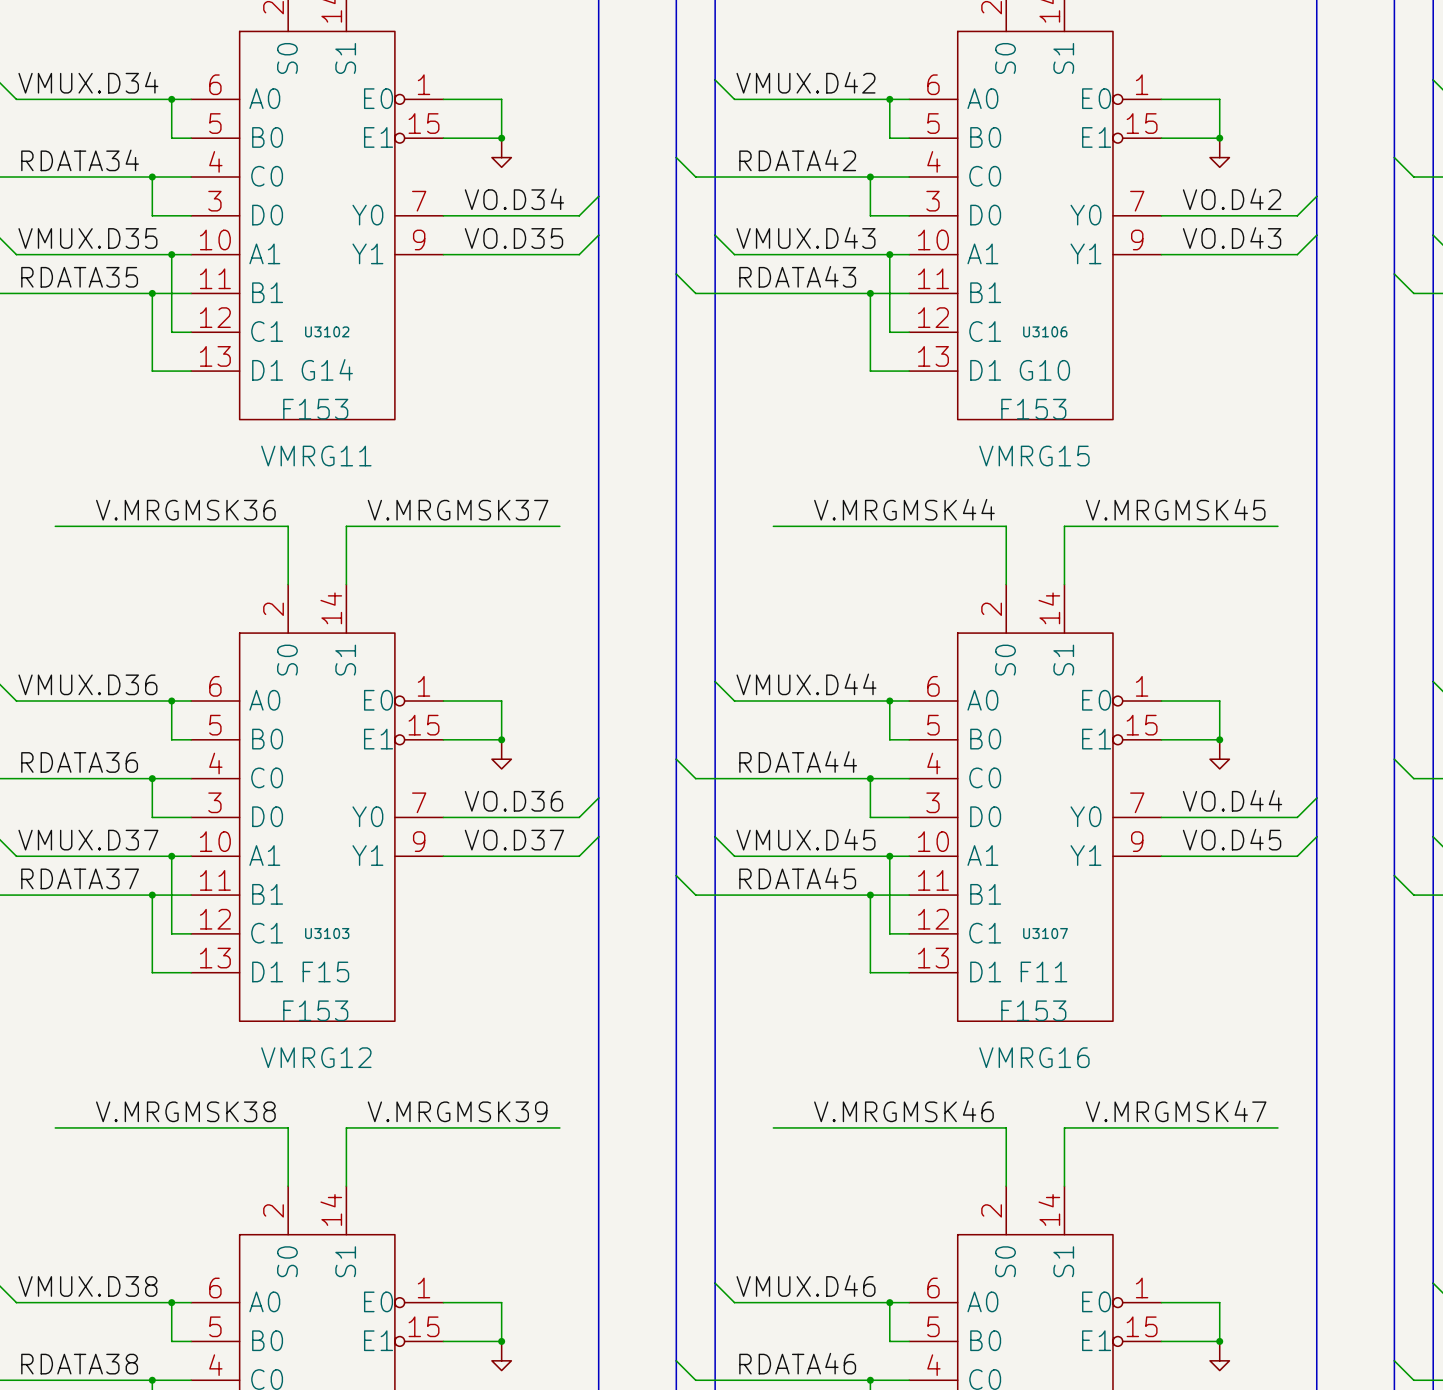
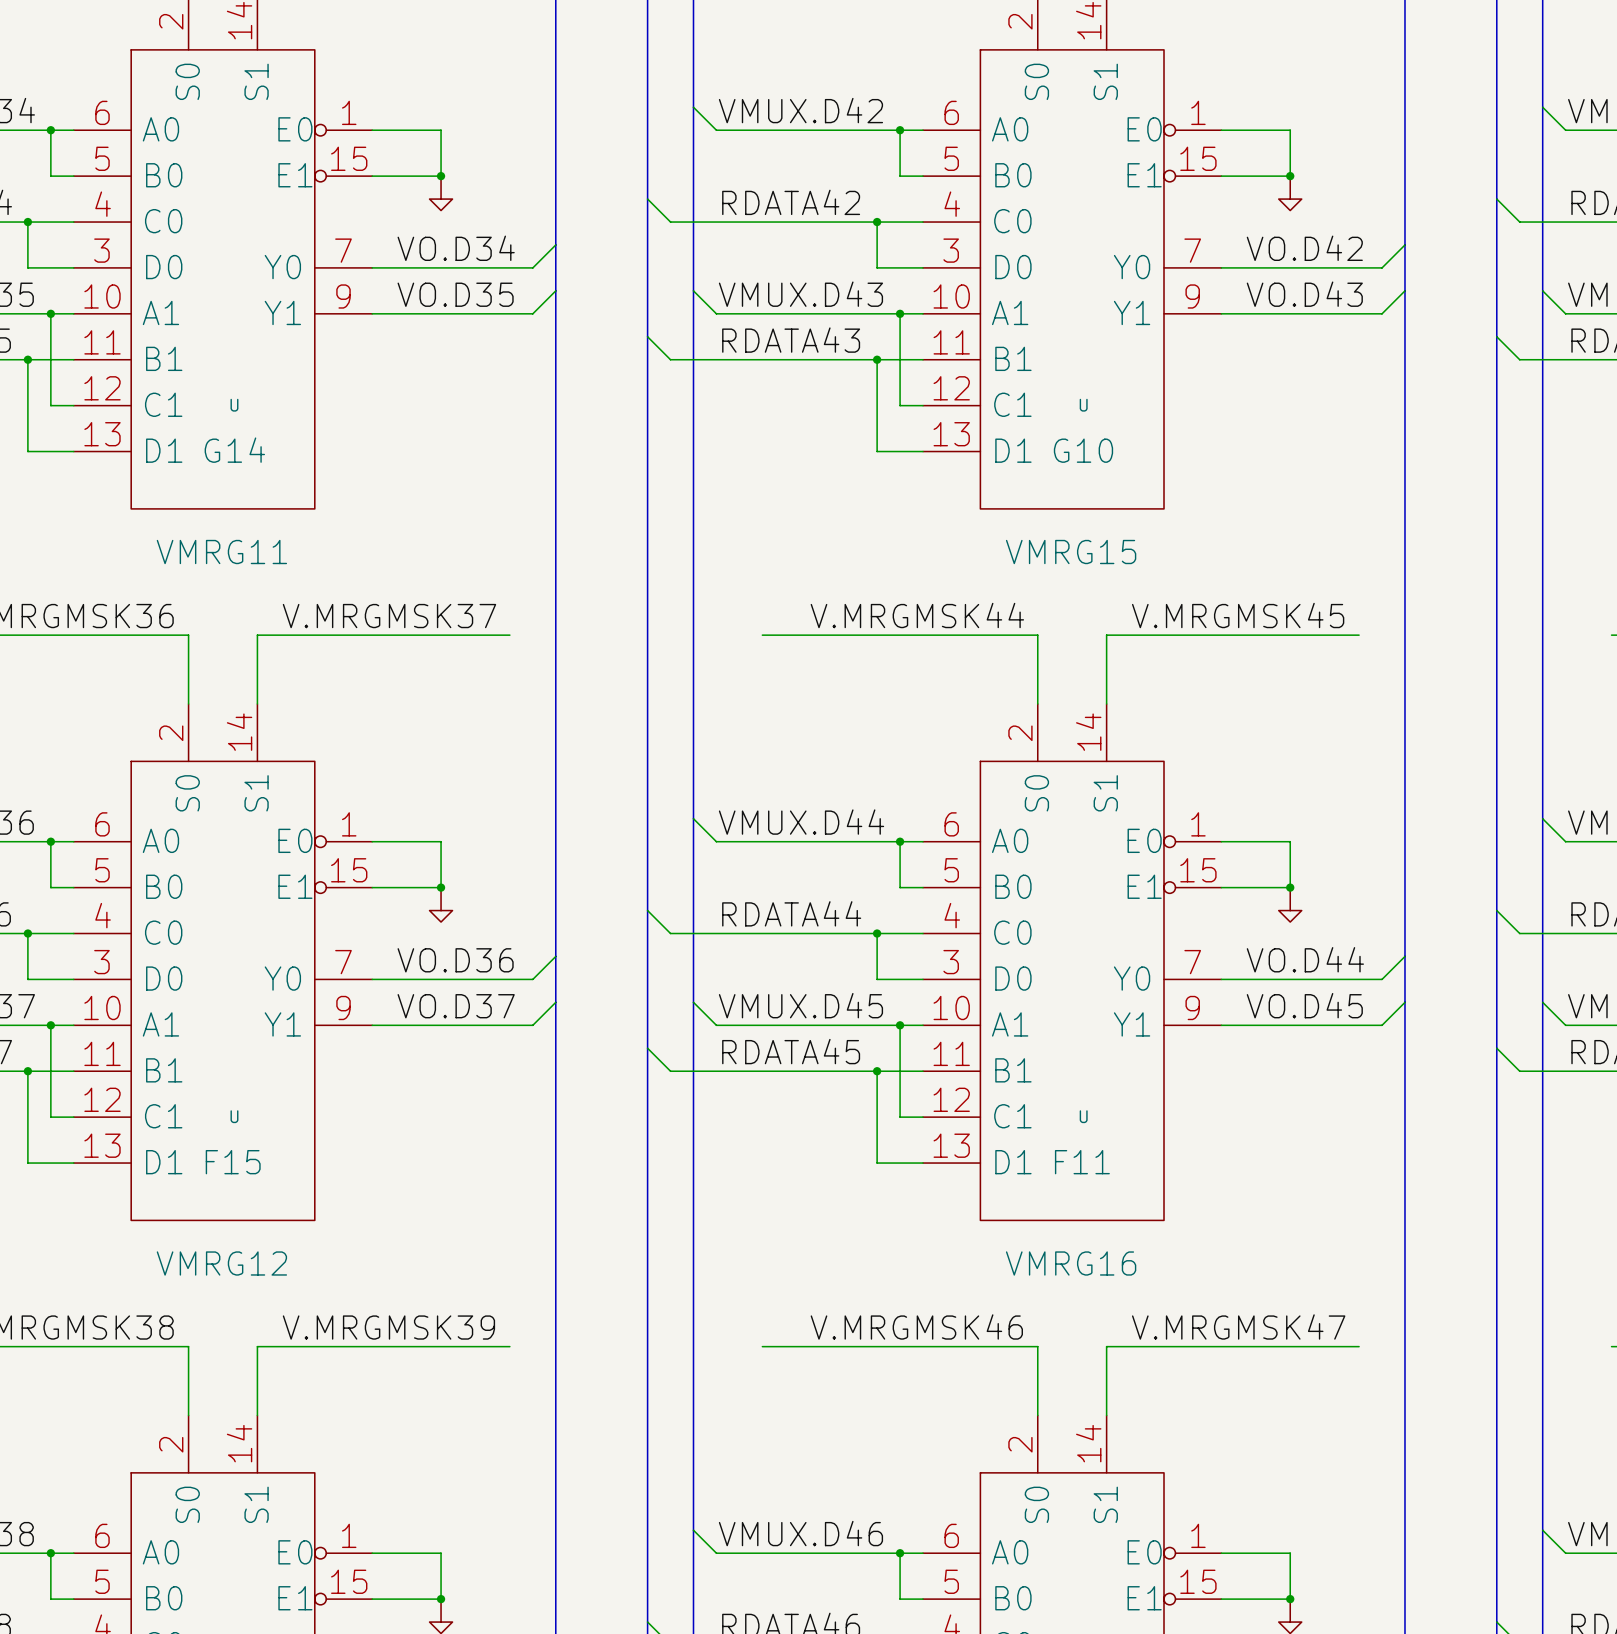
U3102 name: U3102 (327, 331) -> U (234, 405)
U3106 name: U3106 (1045, 331) -> U (1083, 405)
U3102 value: F153 (315, 409) -> none
U3106 value: F153 (1033, 409) -> none
U3103 name: U3103 (327, 933) -> U (234, 1116)
U3107 name: U3107 (1045, 933) -> U (1083, 1116)
U3103 value: F153 (315, 1010) -> none
U3107 value: F153 (1033, 1010) -> none

